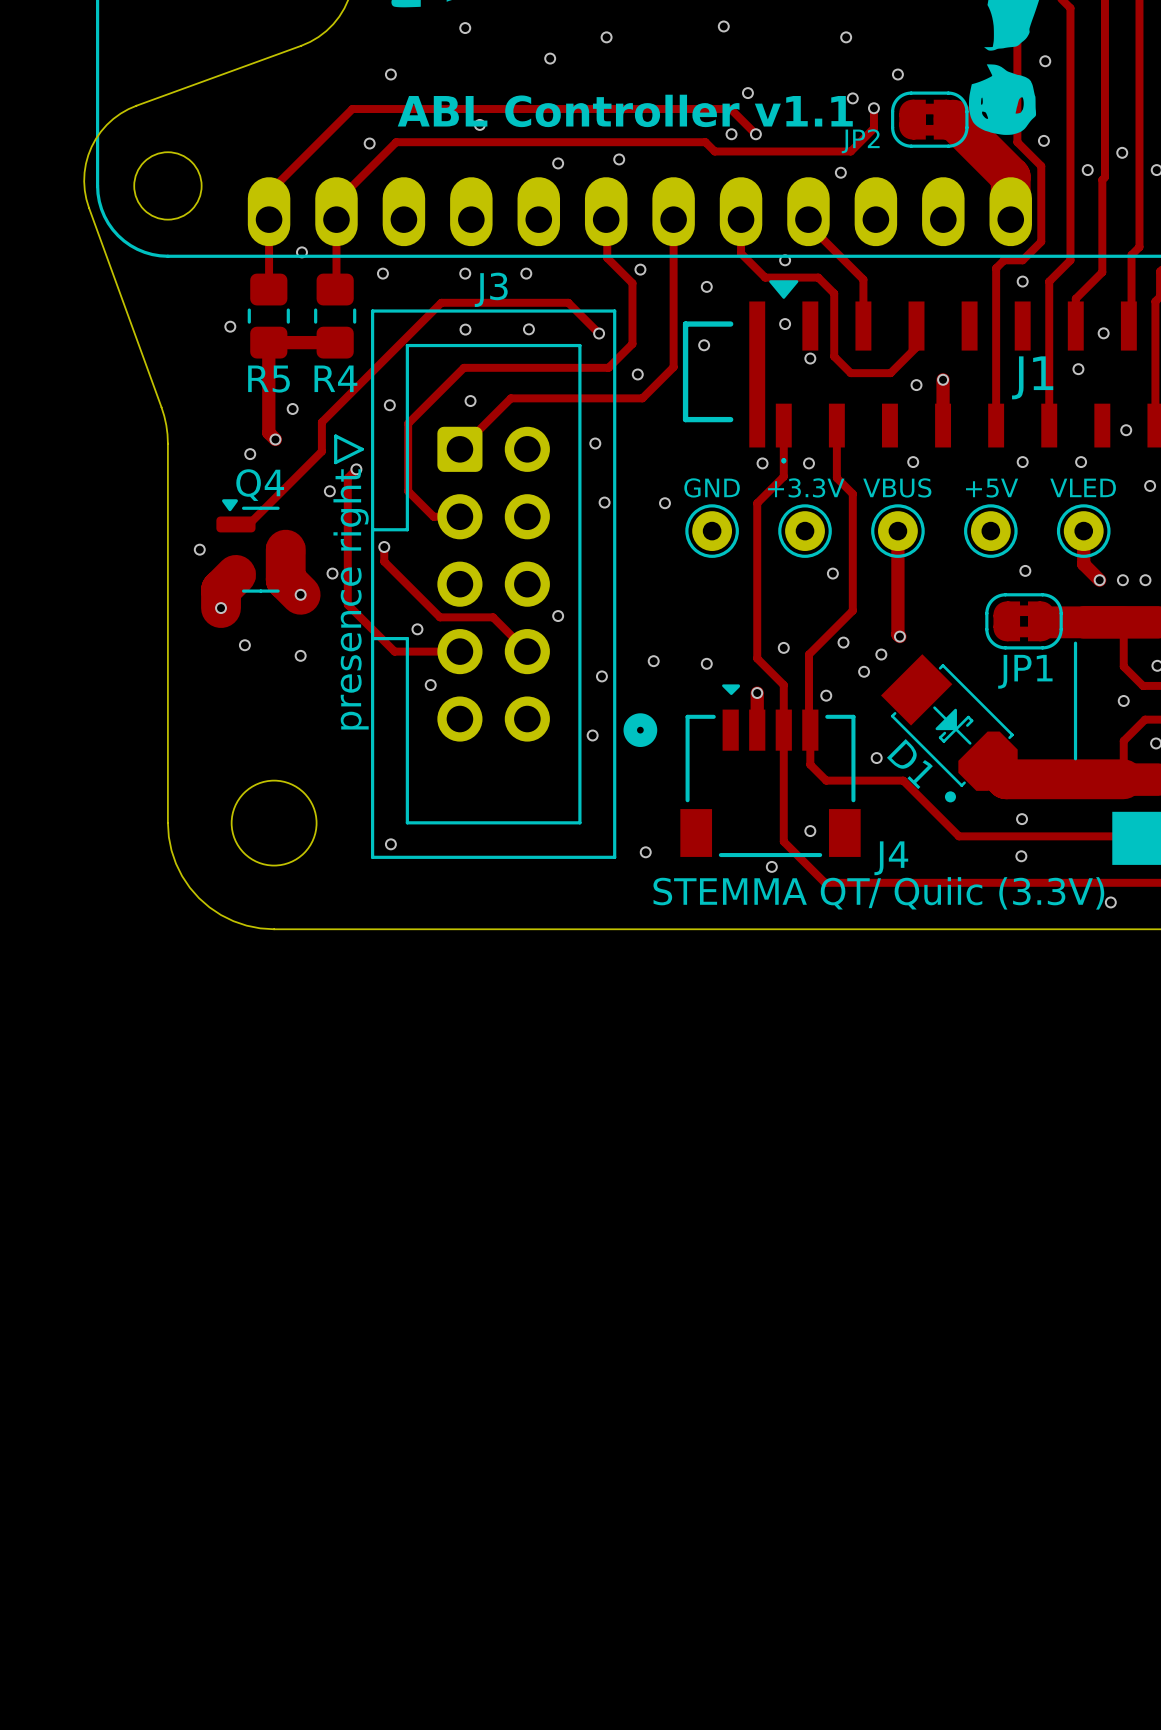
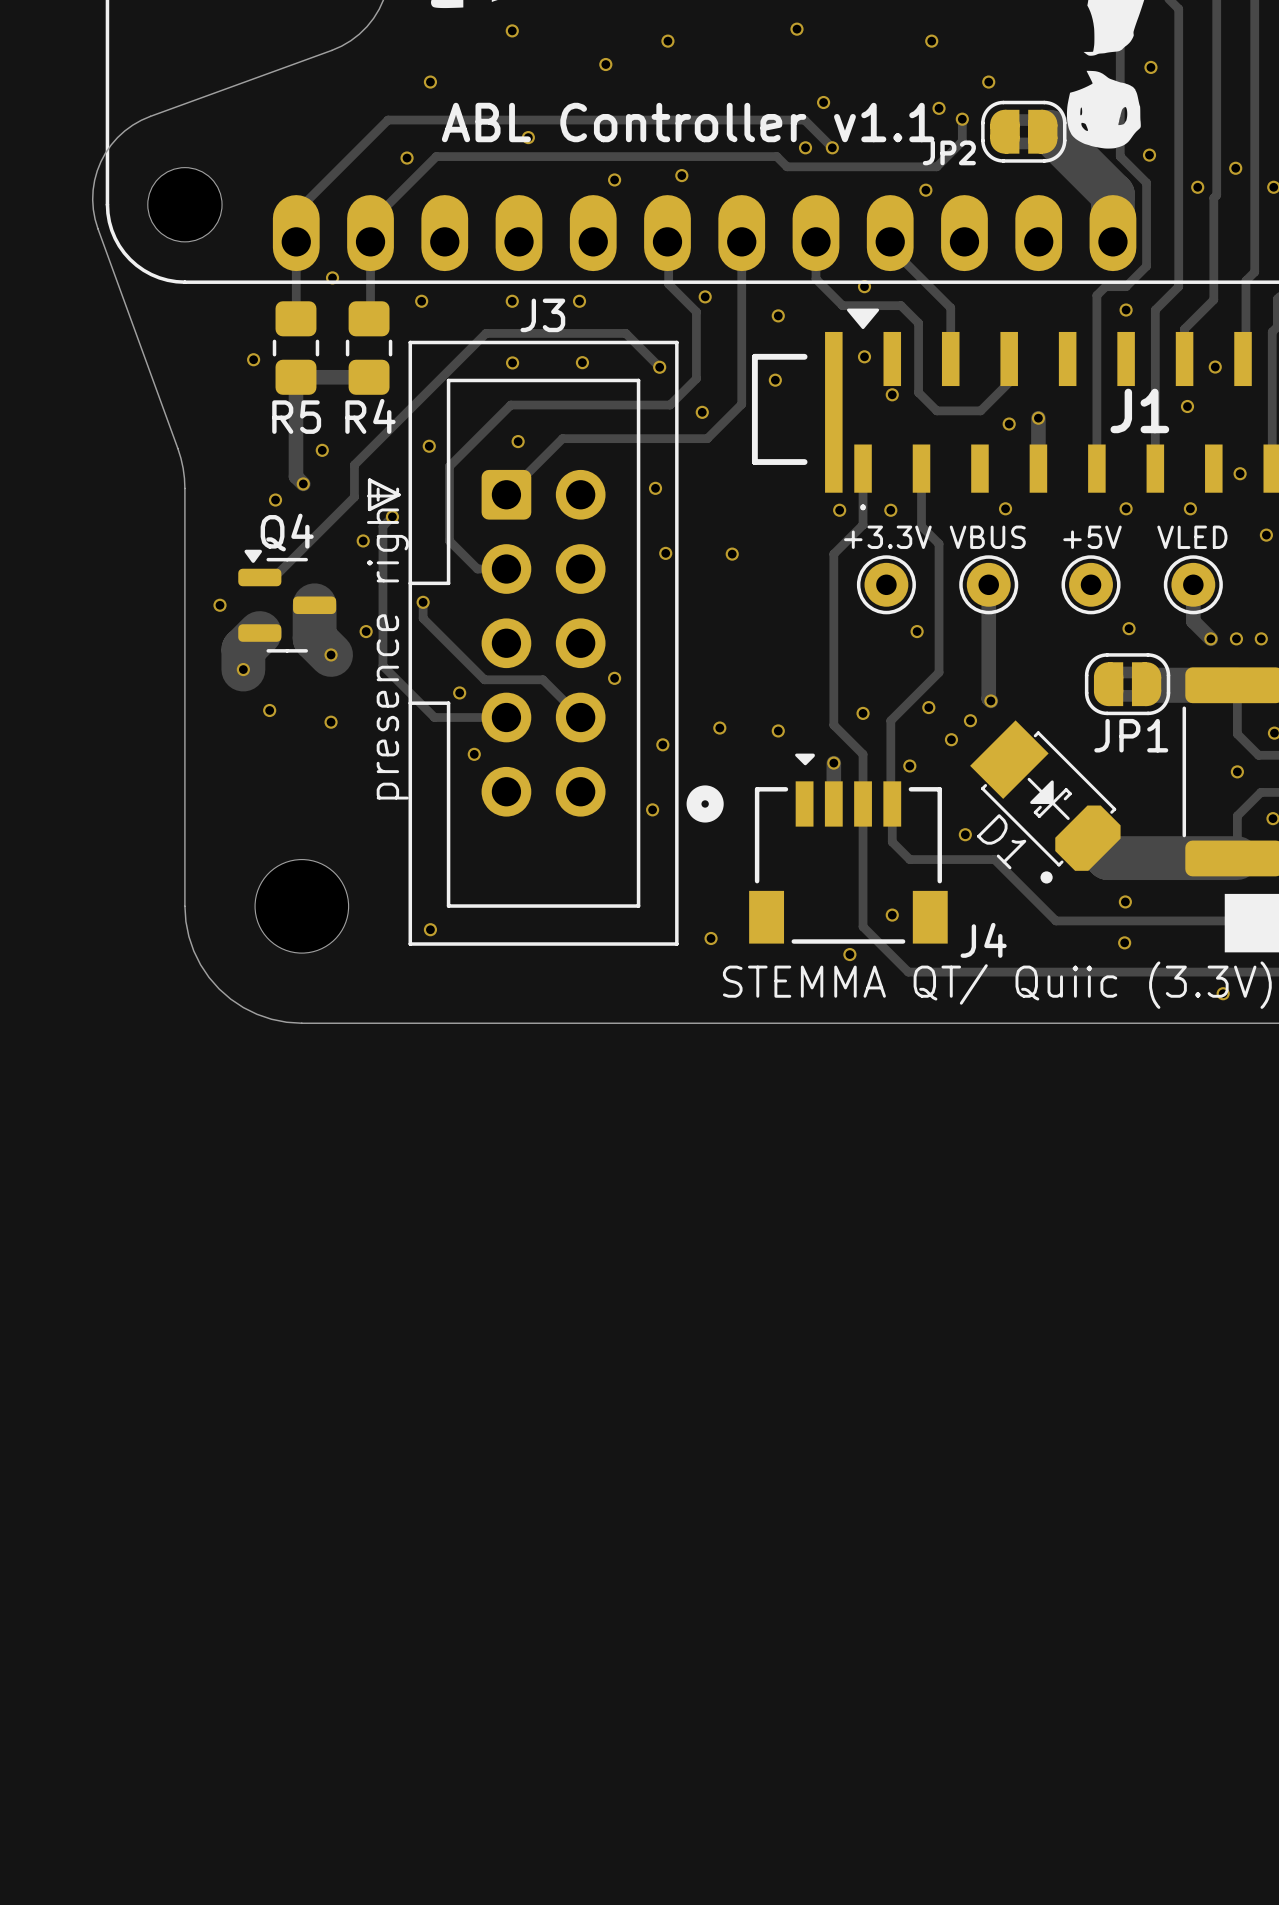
text: GND (712, 487) -> none
part: (712, 531) -> none

